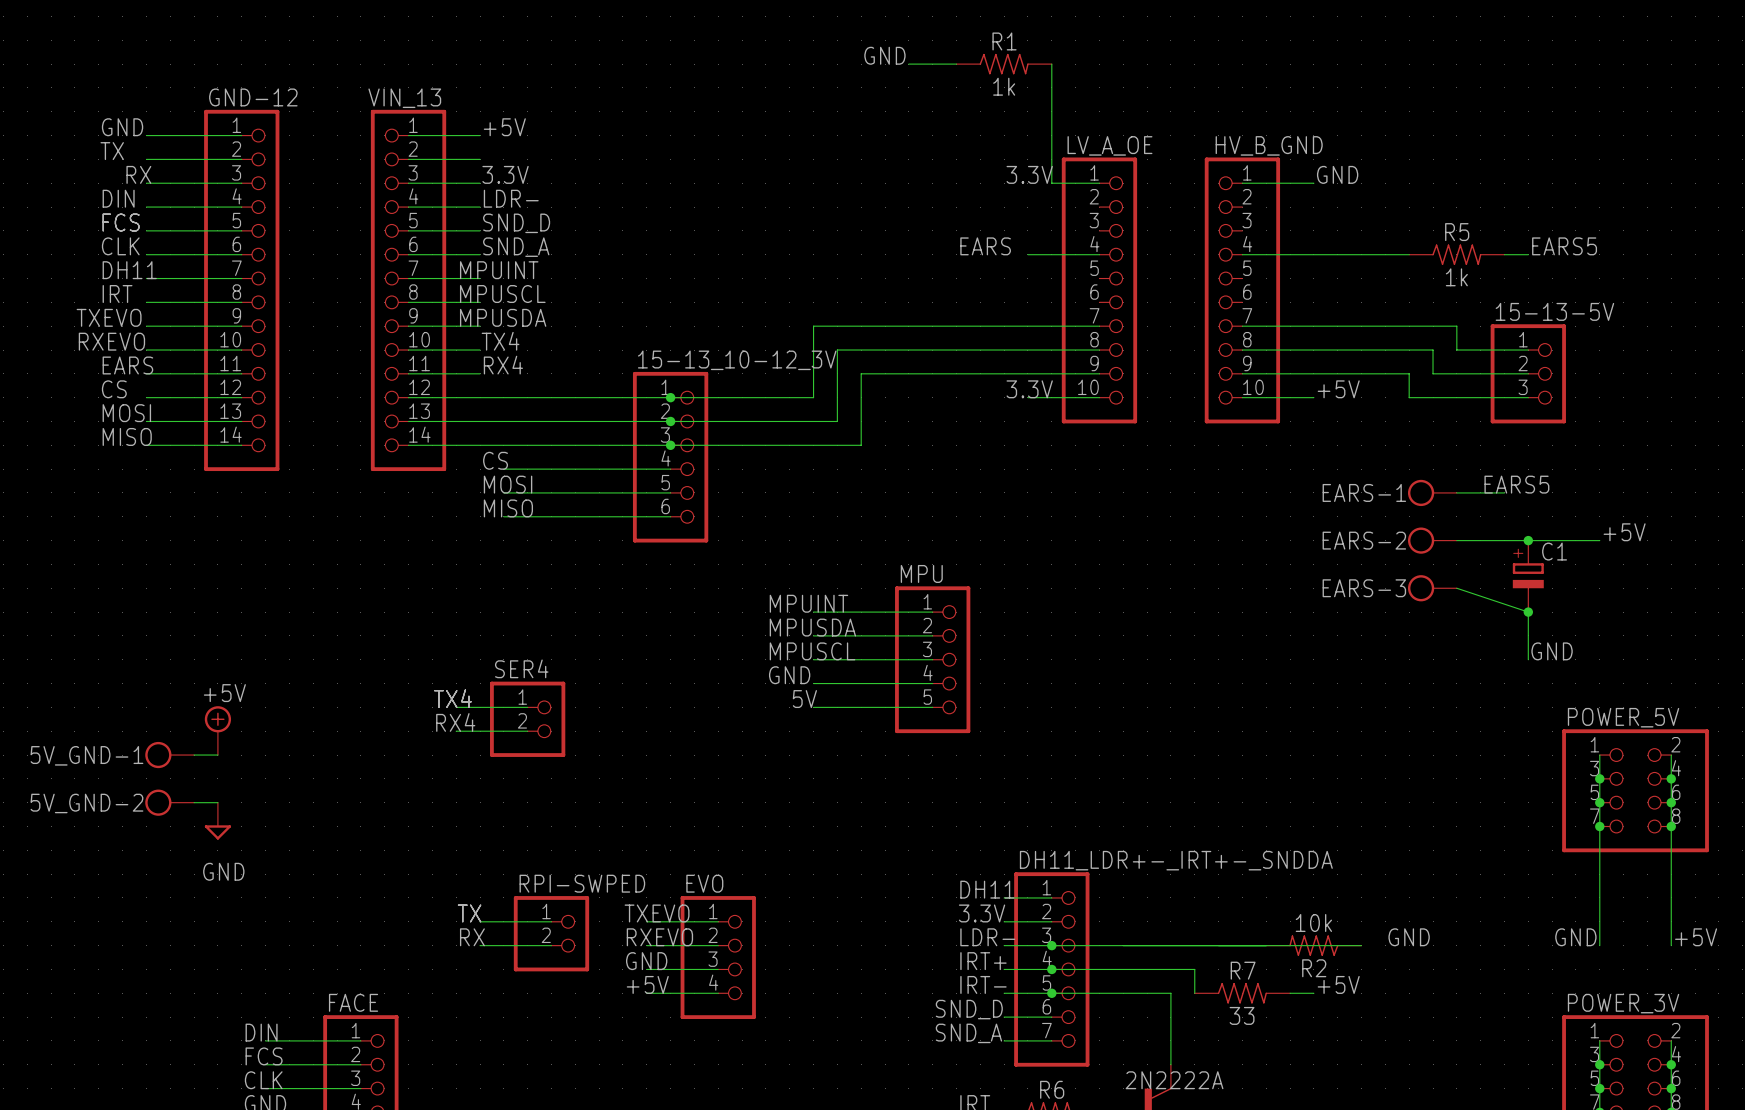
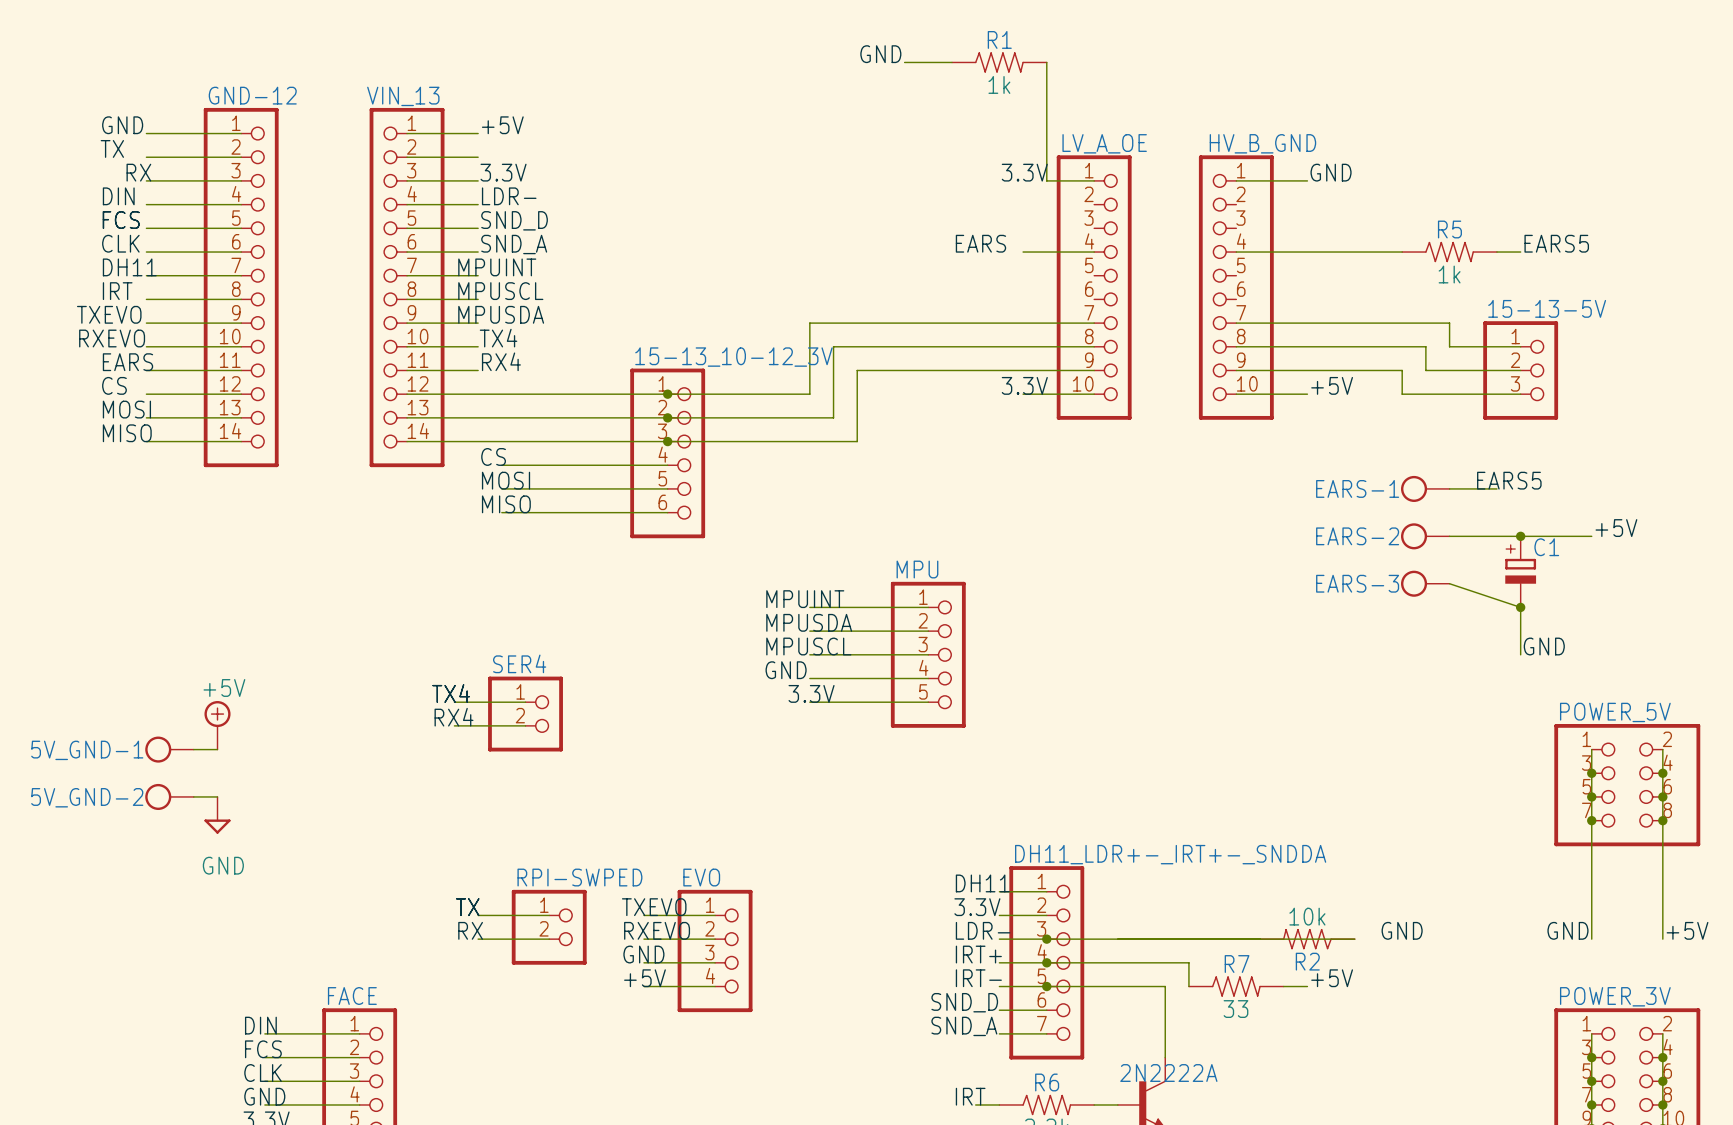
label: 5V (804, 699) -> 3.3V (811, 693)

